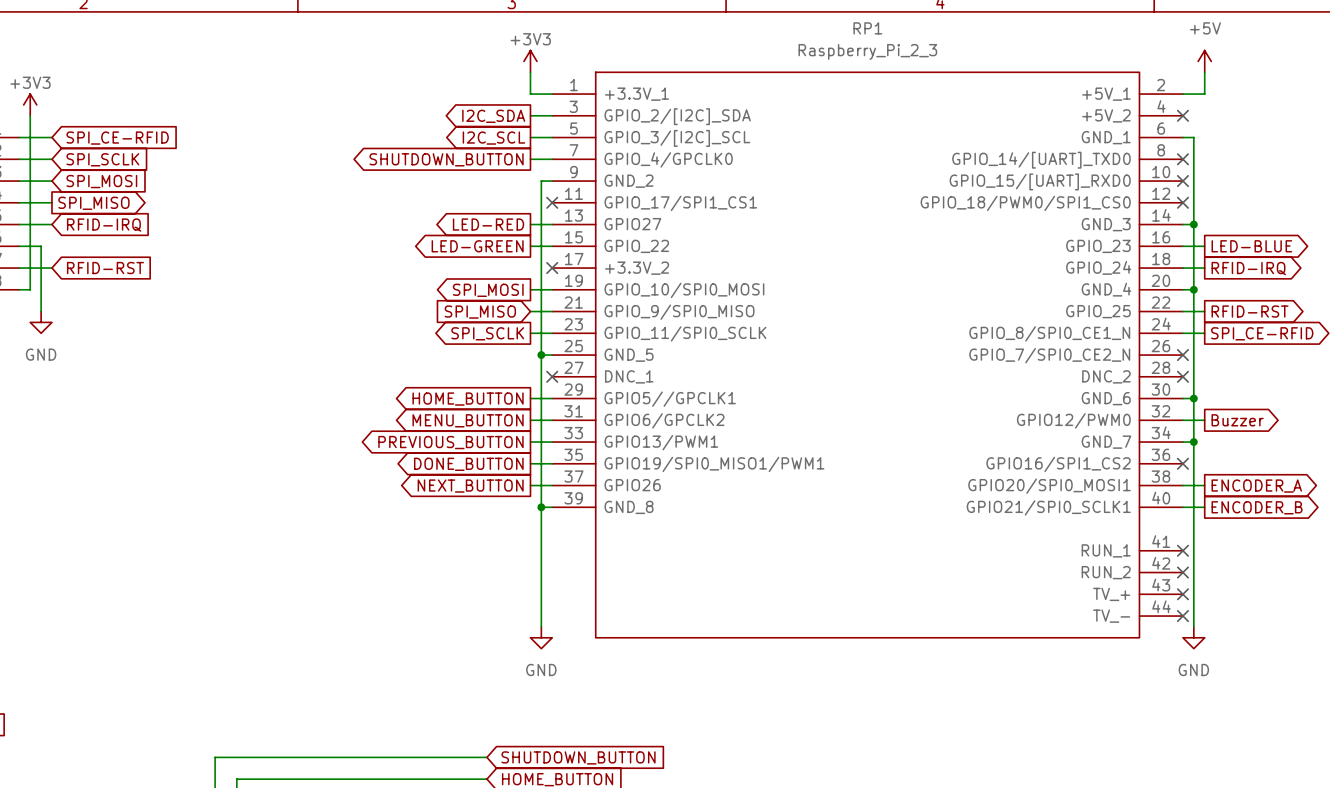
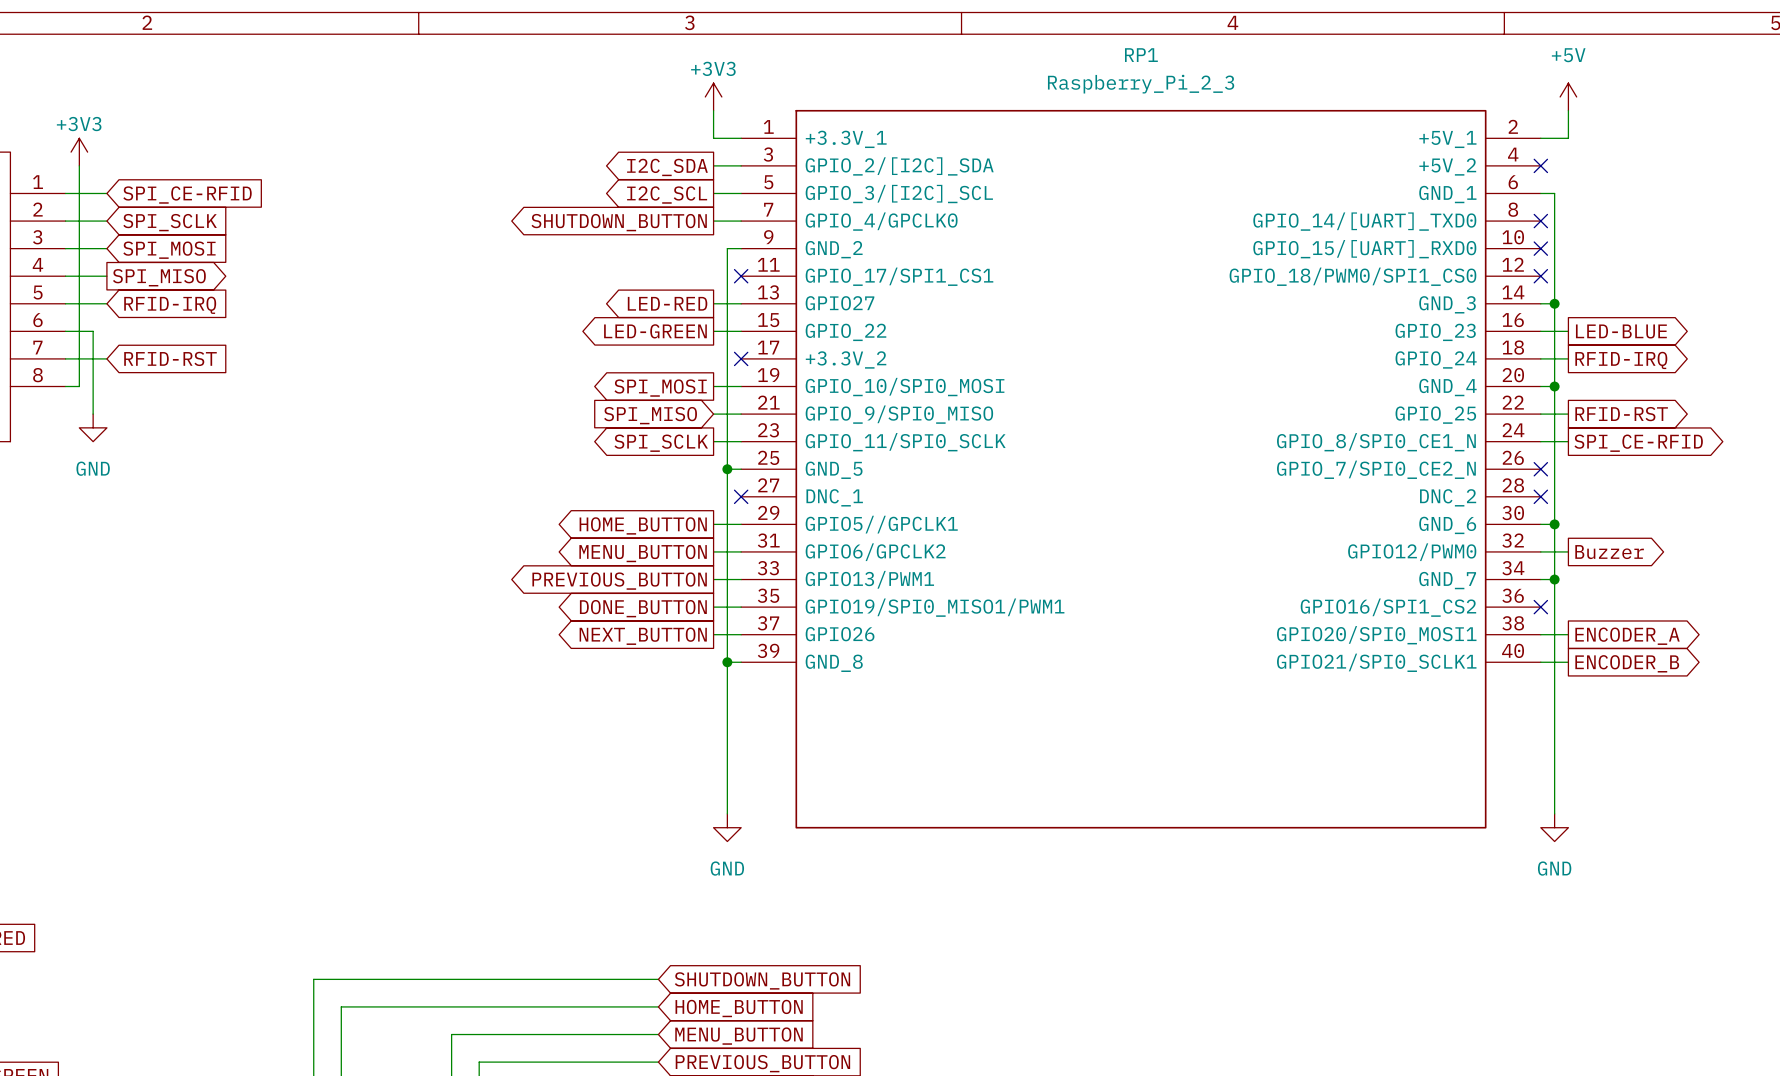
RP1 symbol: [552, 71, 1183, 639] -> [741, 109, 1541, 829]
no-connect mark: (1182, 550) -> none
no-connect mark: (1182, 572) -> none
no-connect mark: (1182, 594) -> none
no-connect mark: (1182, 616) -> none

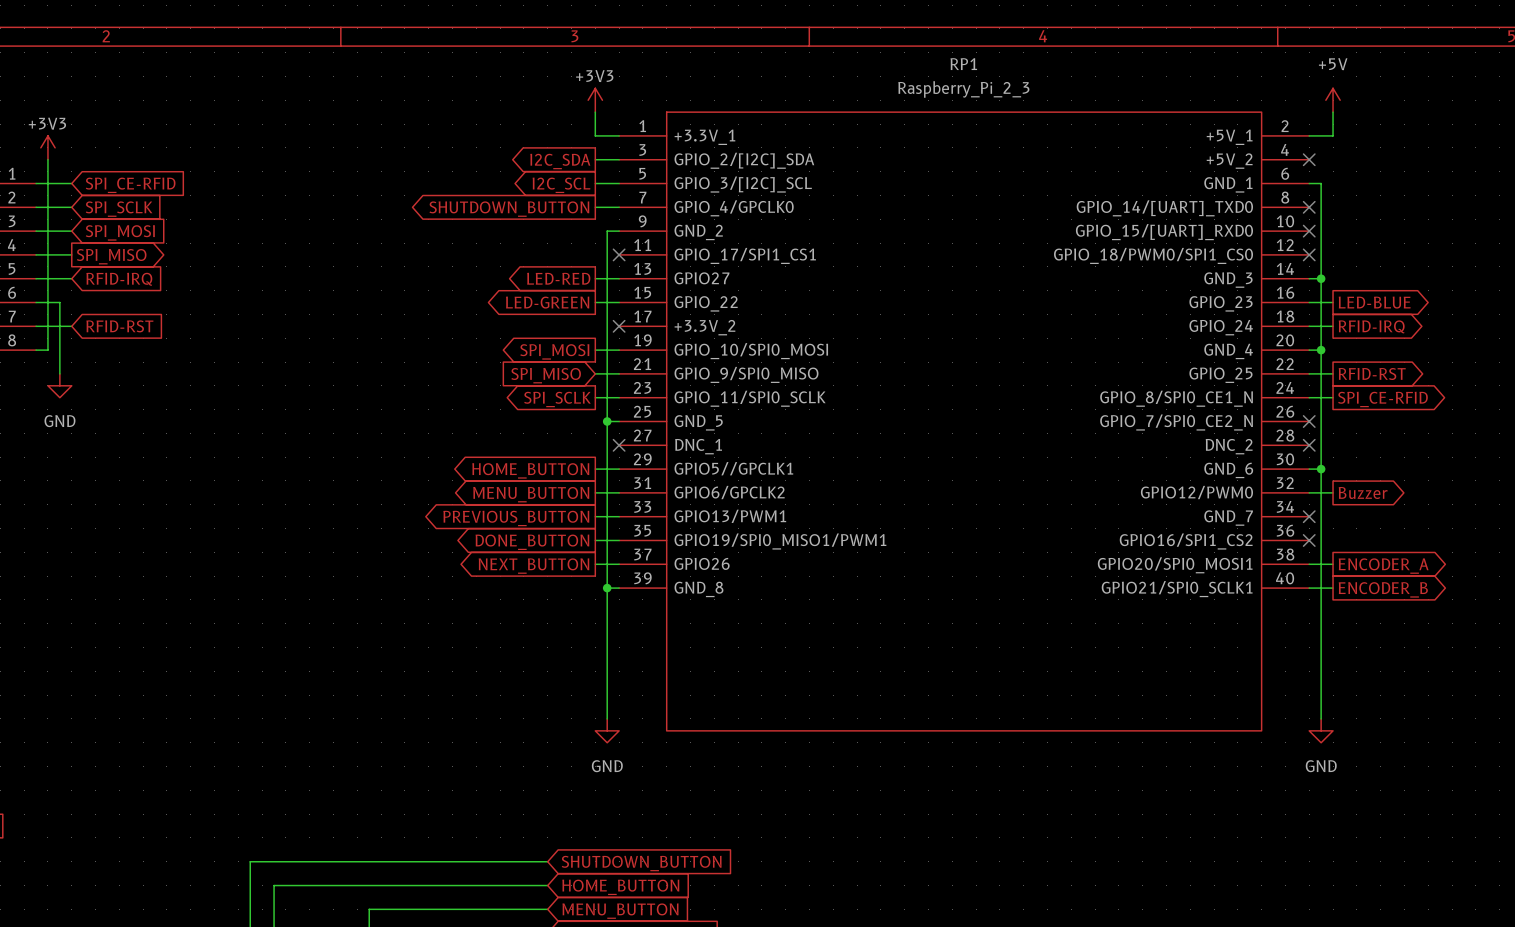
wire: (1540, 579) (1554, 579) -> none
no-connect mark: none -> (1309, 516)
junction: (1554, 579) -> none

